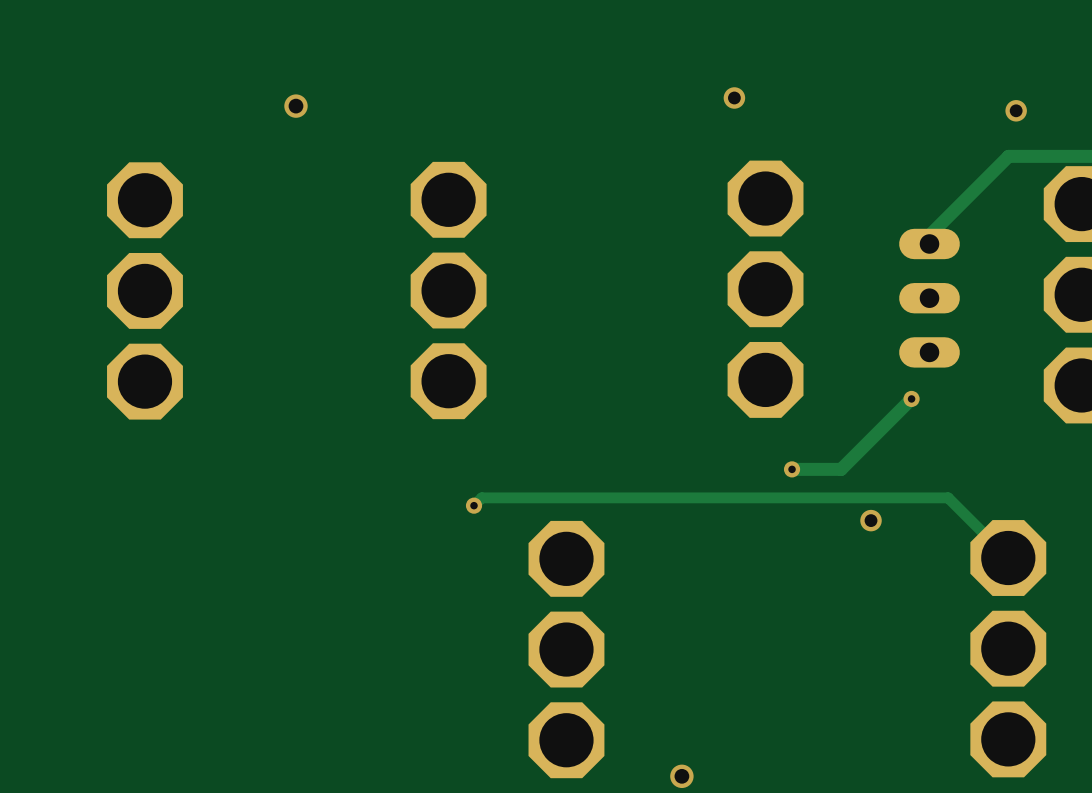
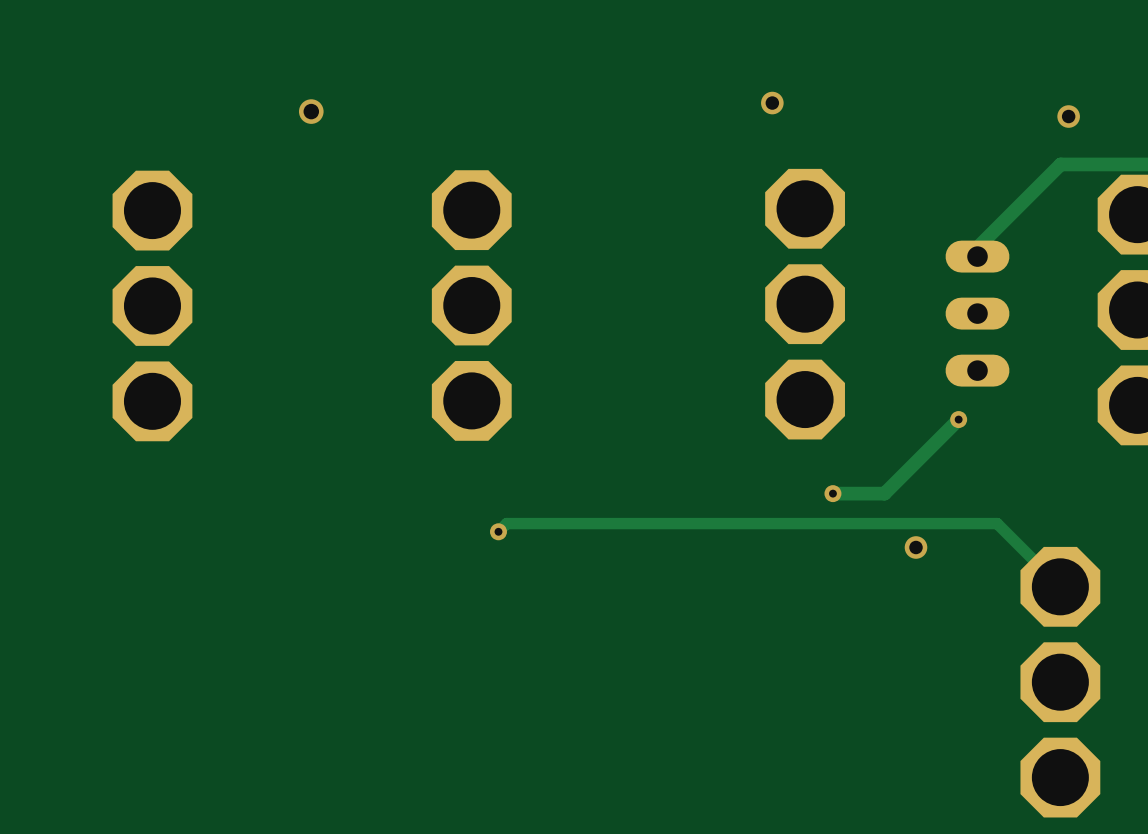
part: (566, 649) -> none
via: (681, 776) -> none

